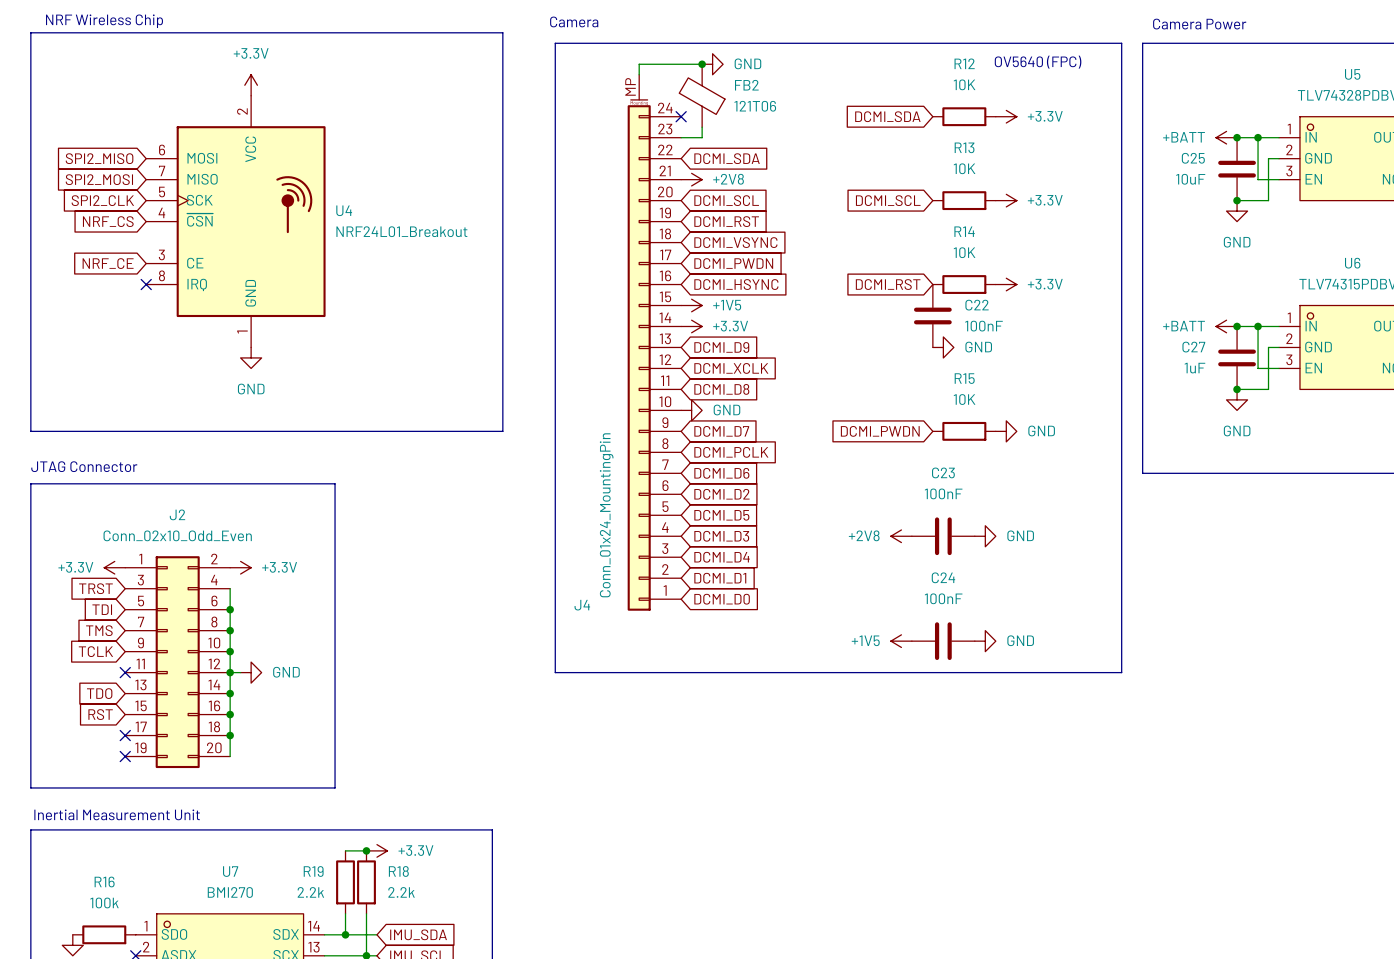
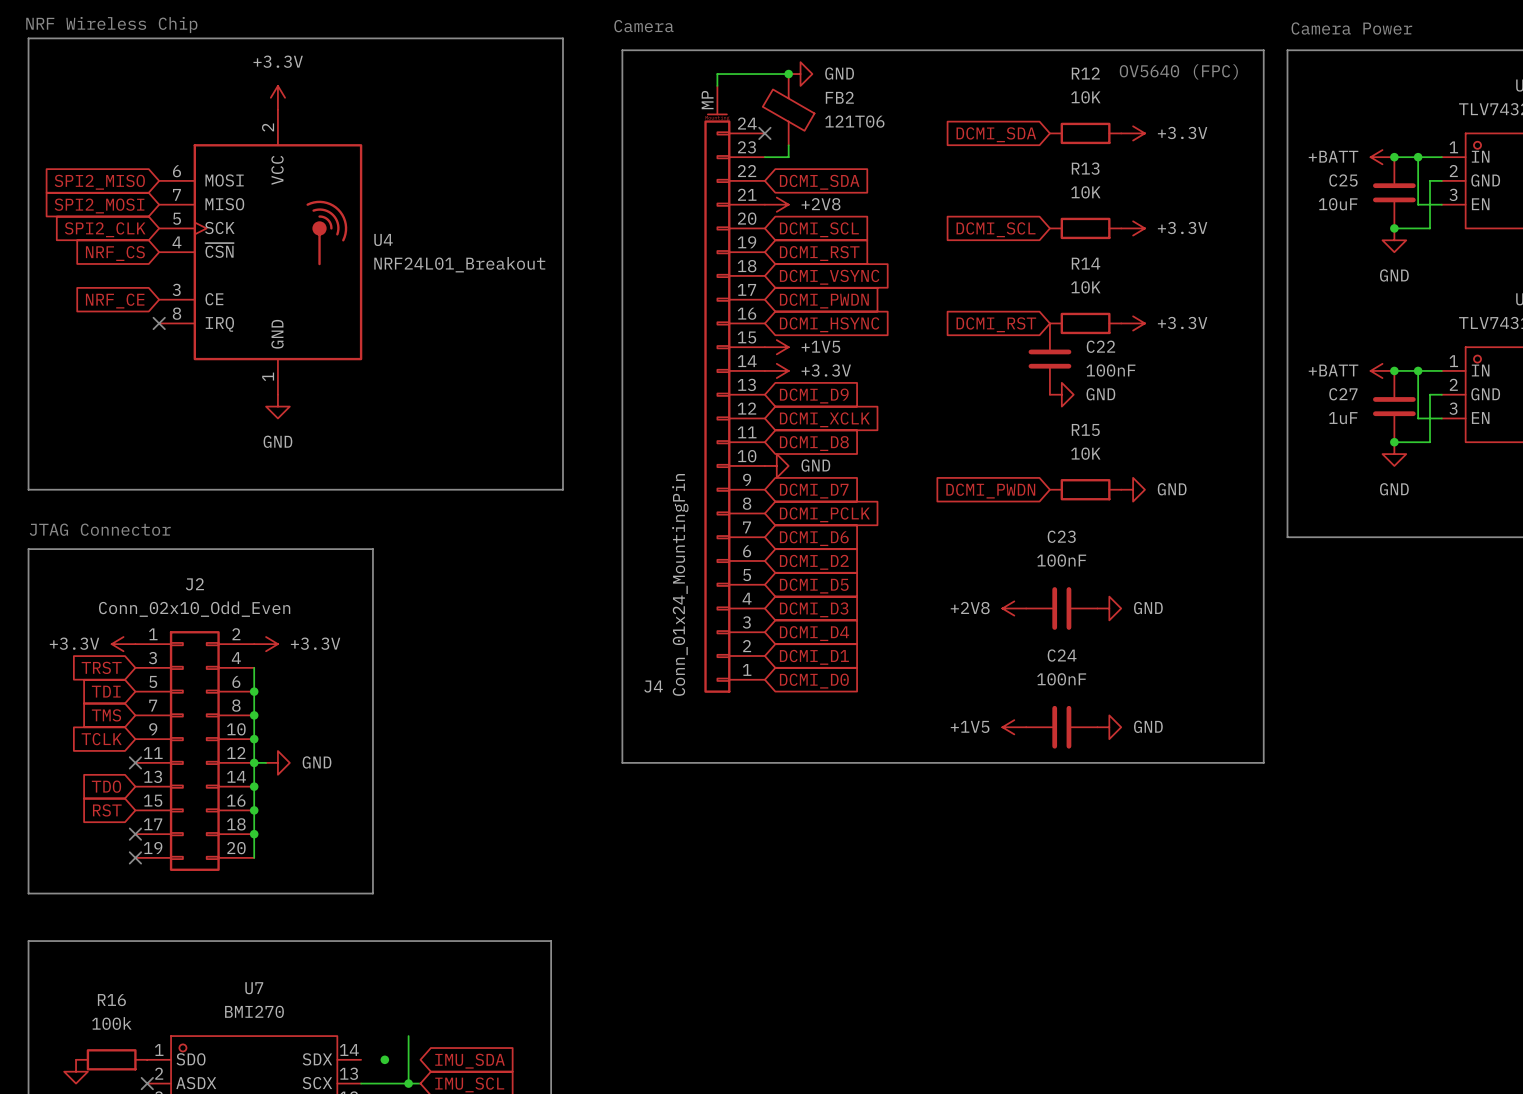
text: Inertial Measurement Unit (117, 814) -> none
wire: (345, 850) (366, 850) -> none
junction: (366, 850) -> none
power symbol: +3.3V (376, 850) -> none
R19: 2.2k (345, 882) -> none
R18: 2.2k (366, 882) -> none
wire: (345, 913) (345, 934) -> none
wire: (324, 934) (376, 934) -> none

